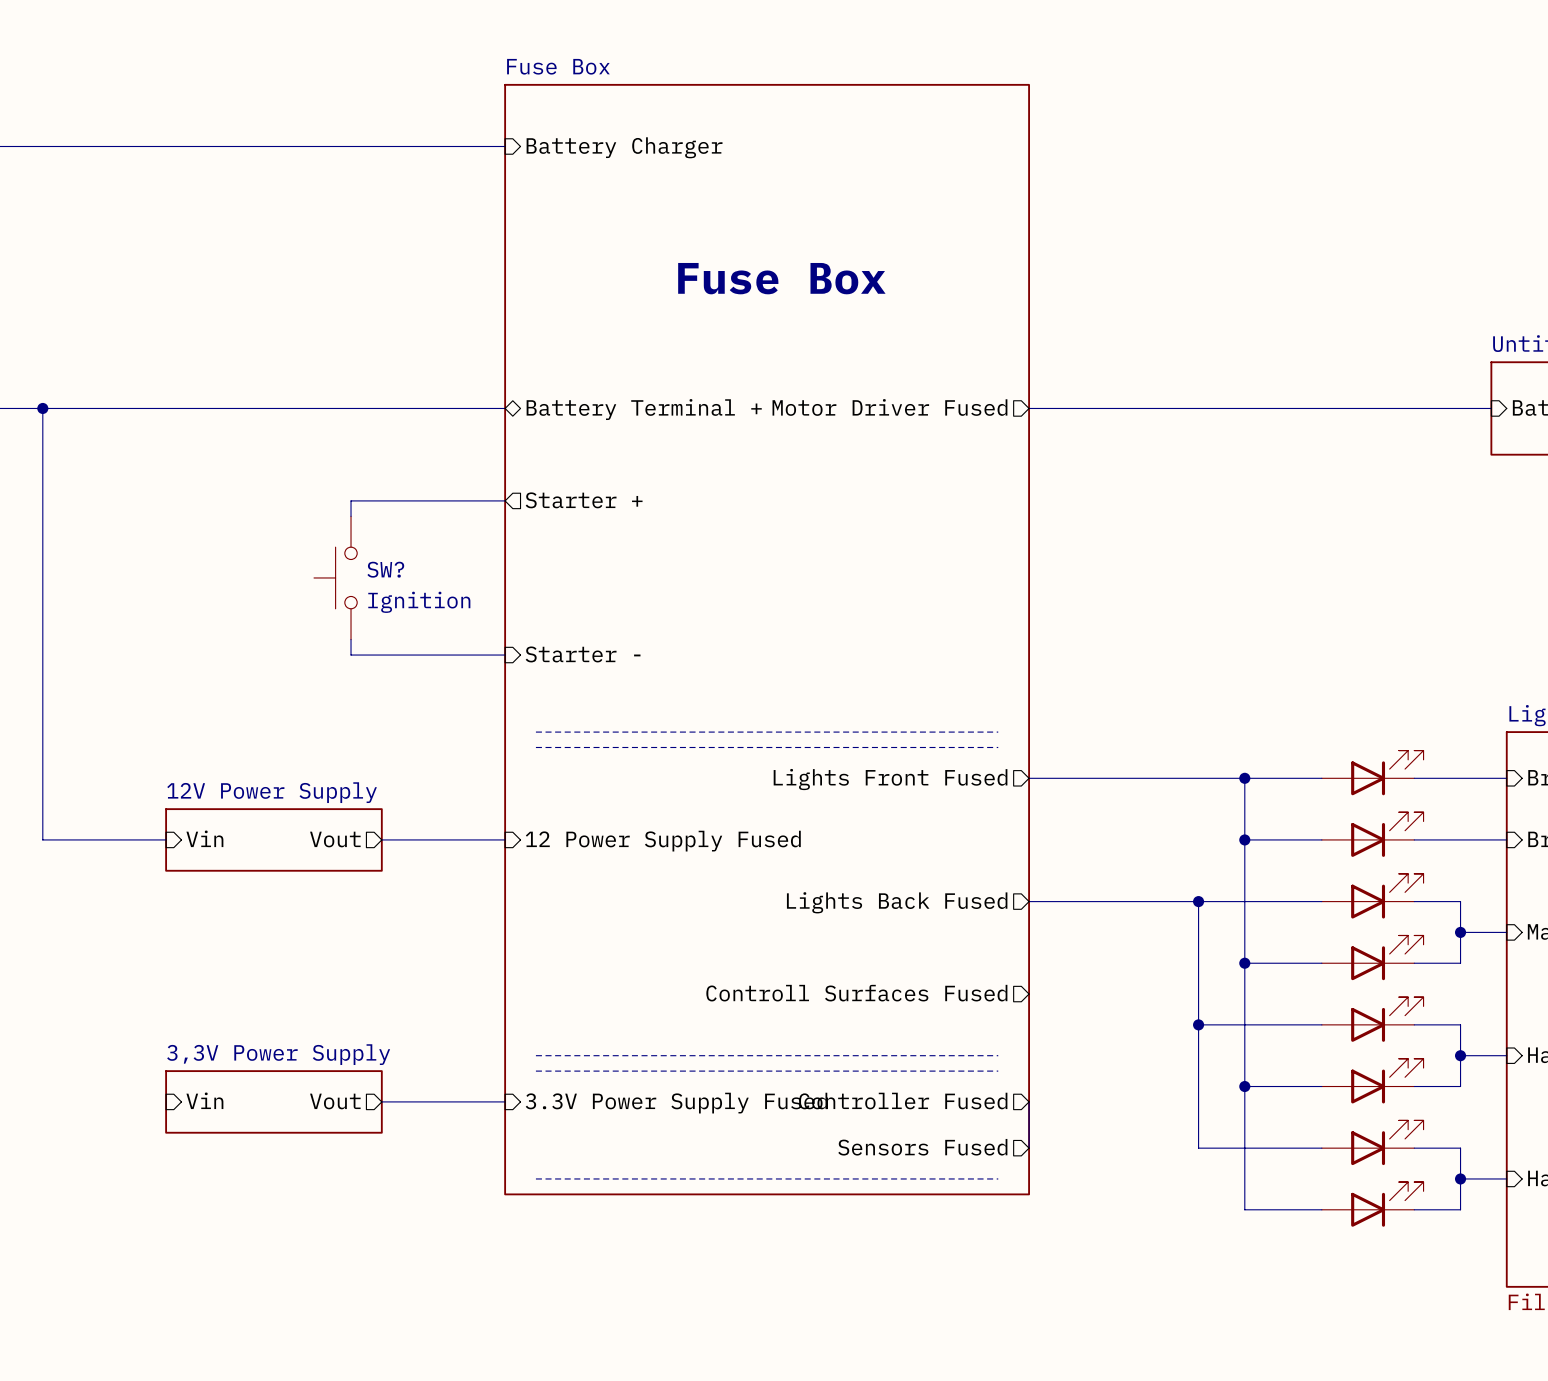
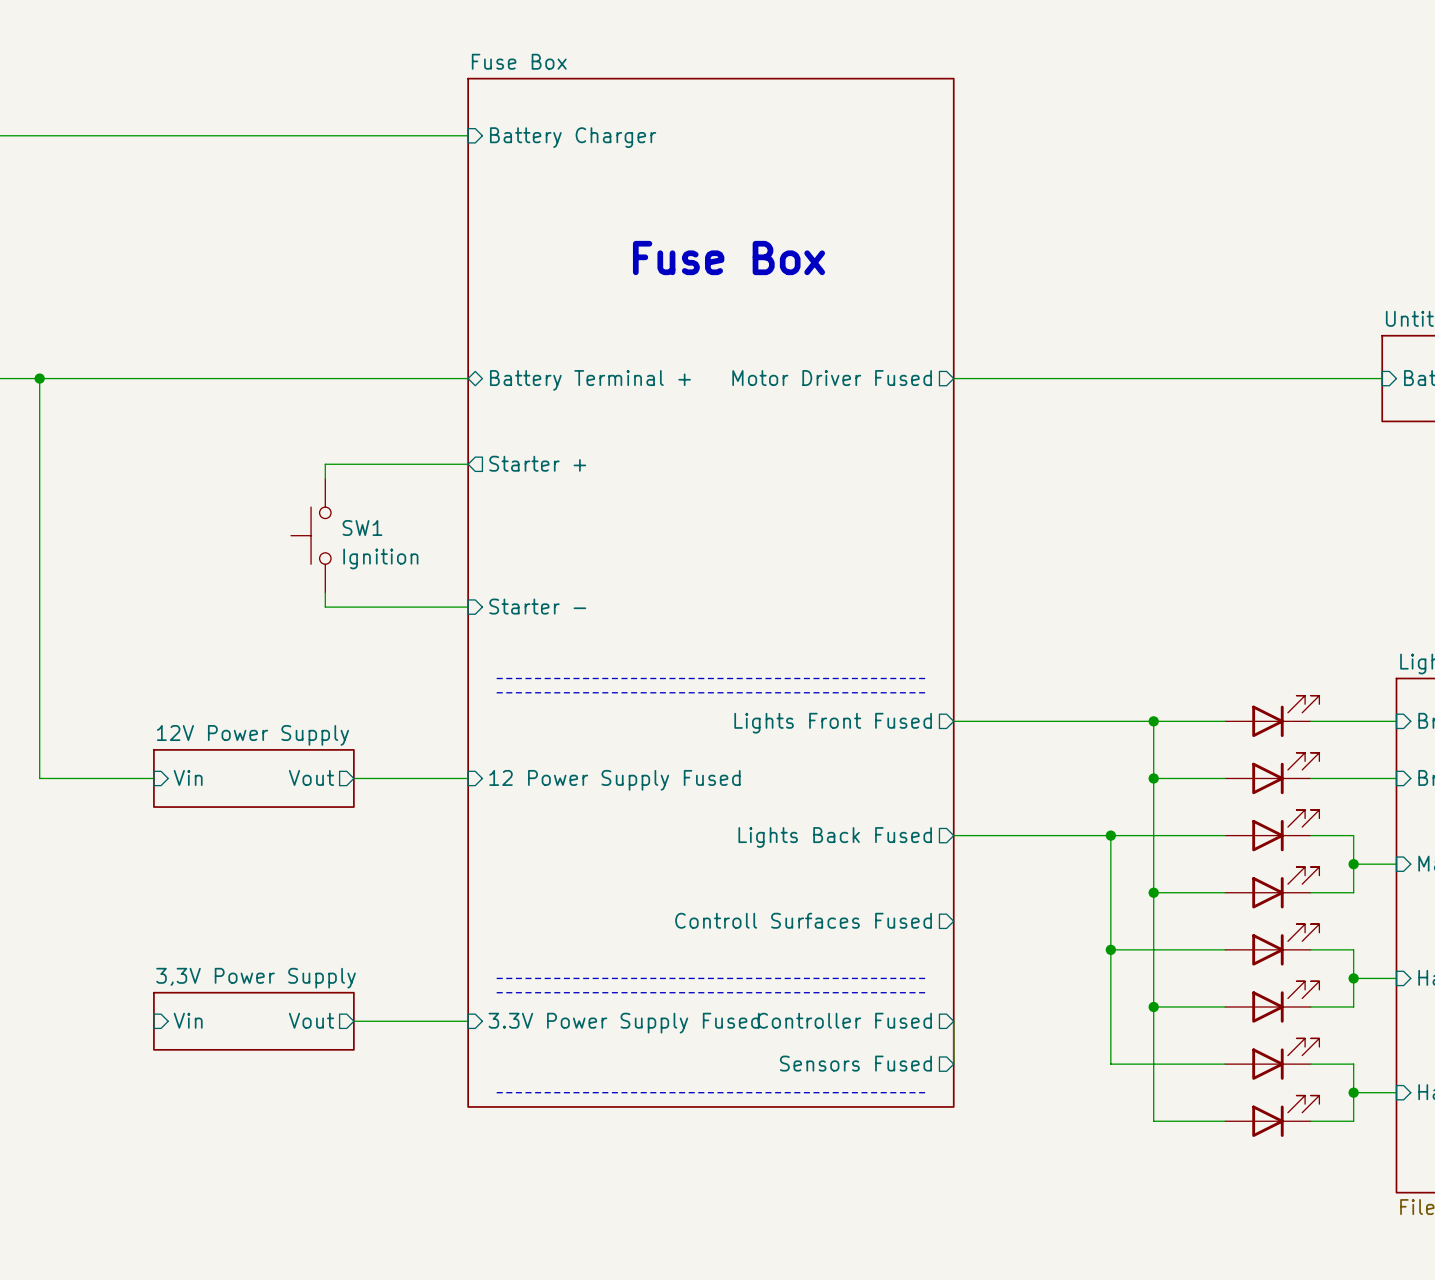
SW? name: SW? (385, 569) -> SW1 (362, 528)

